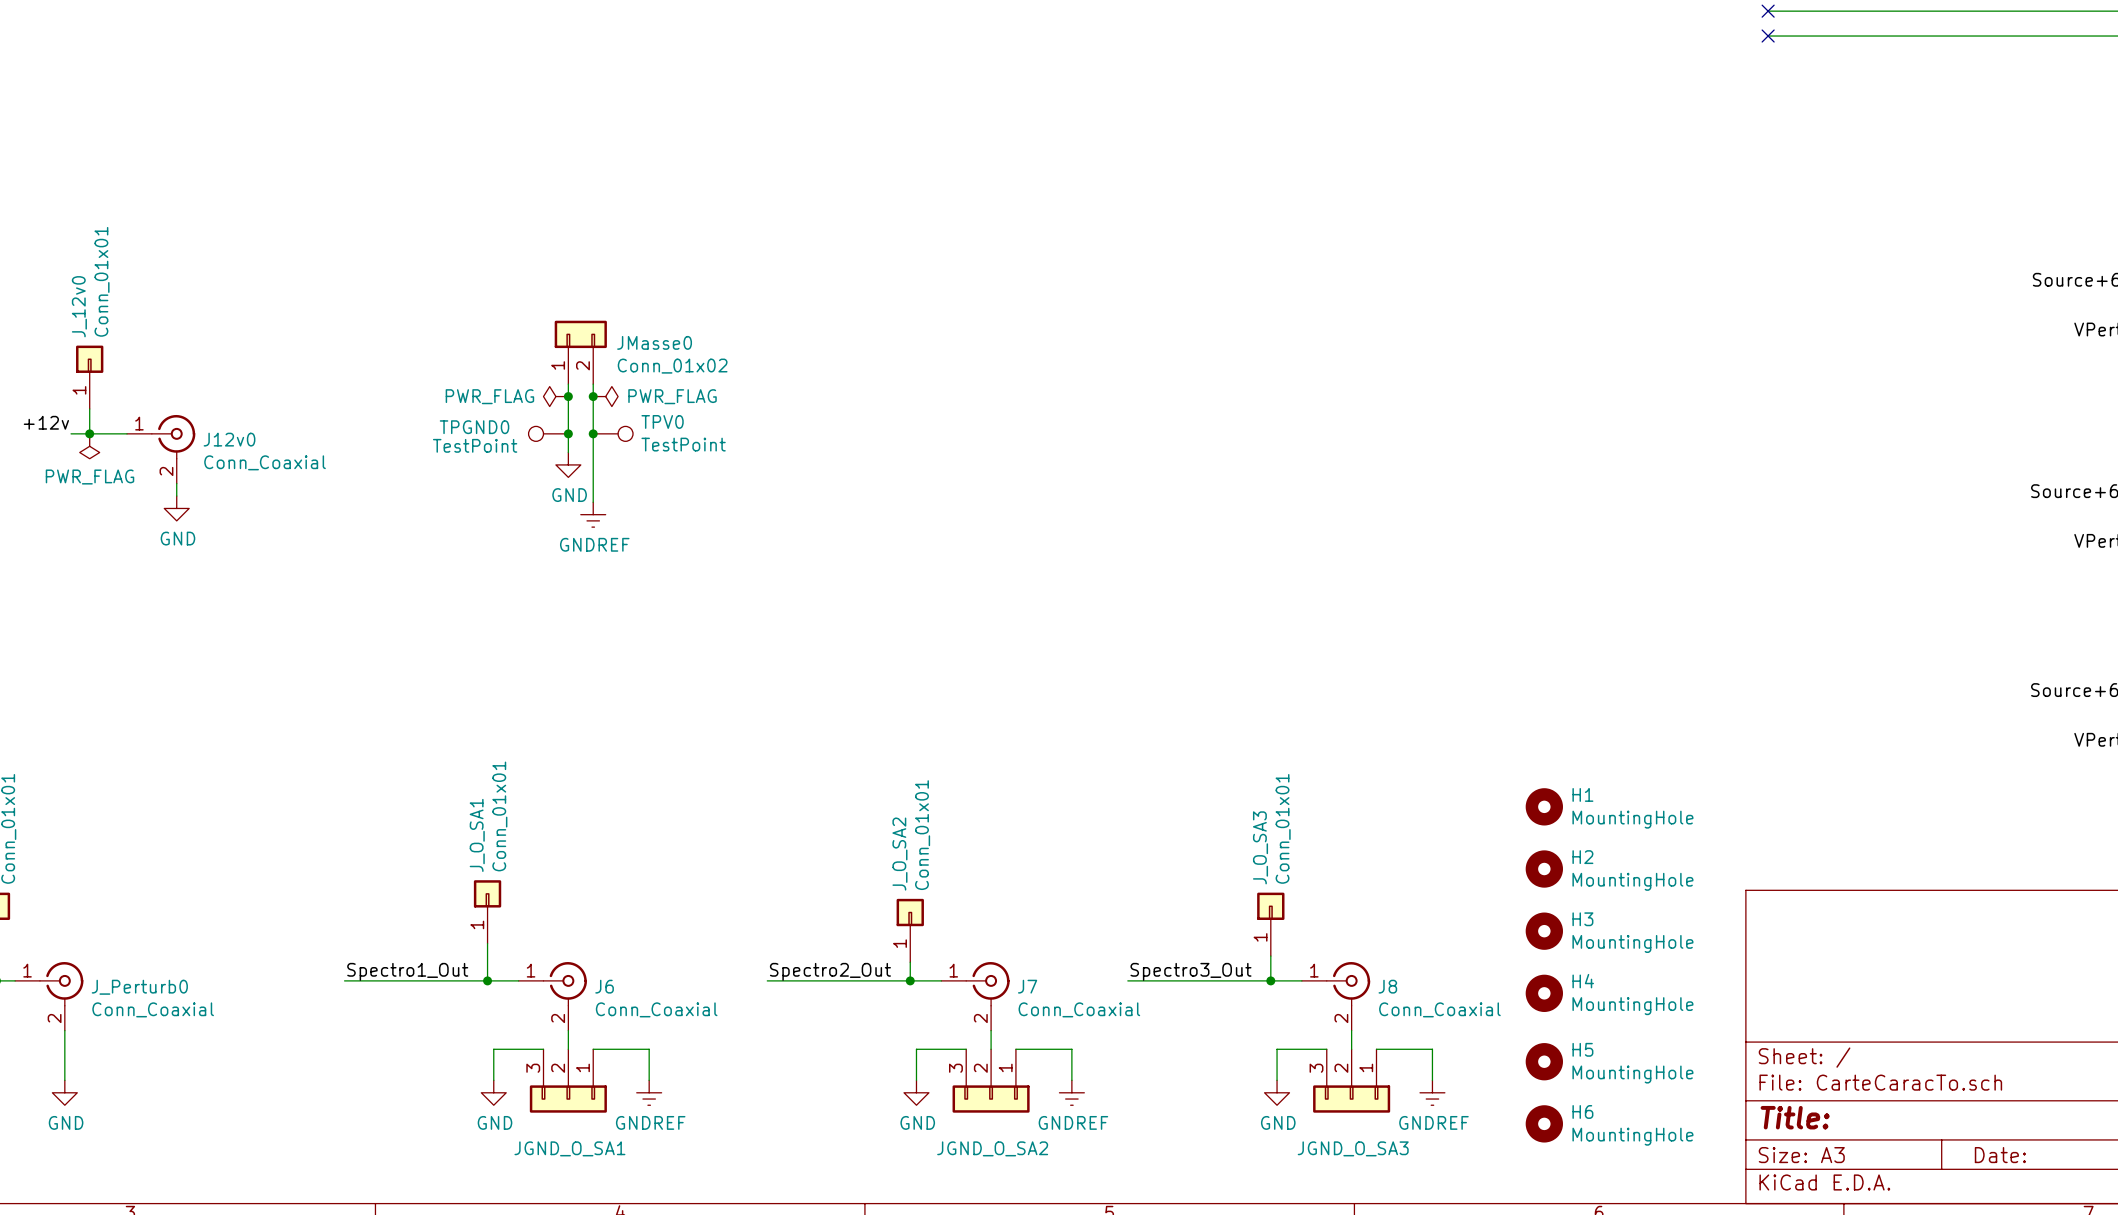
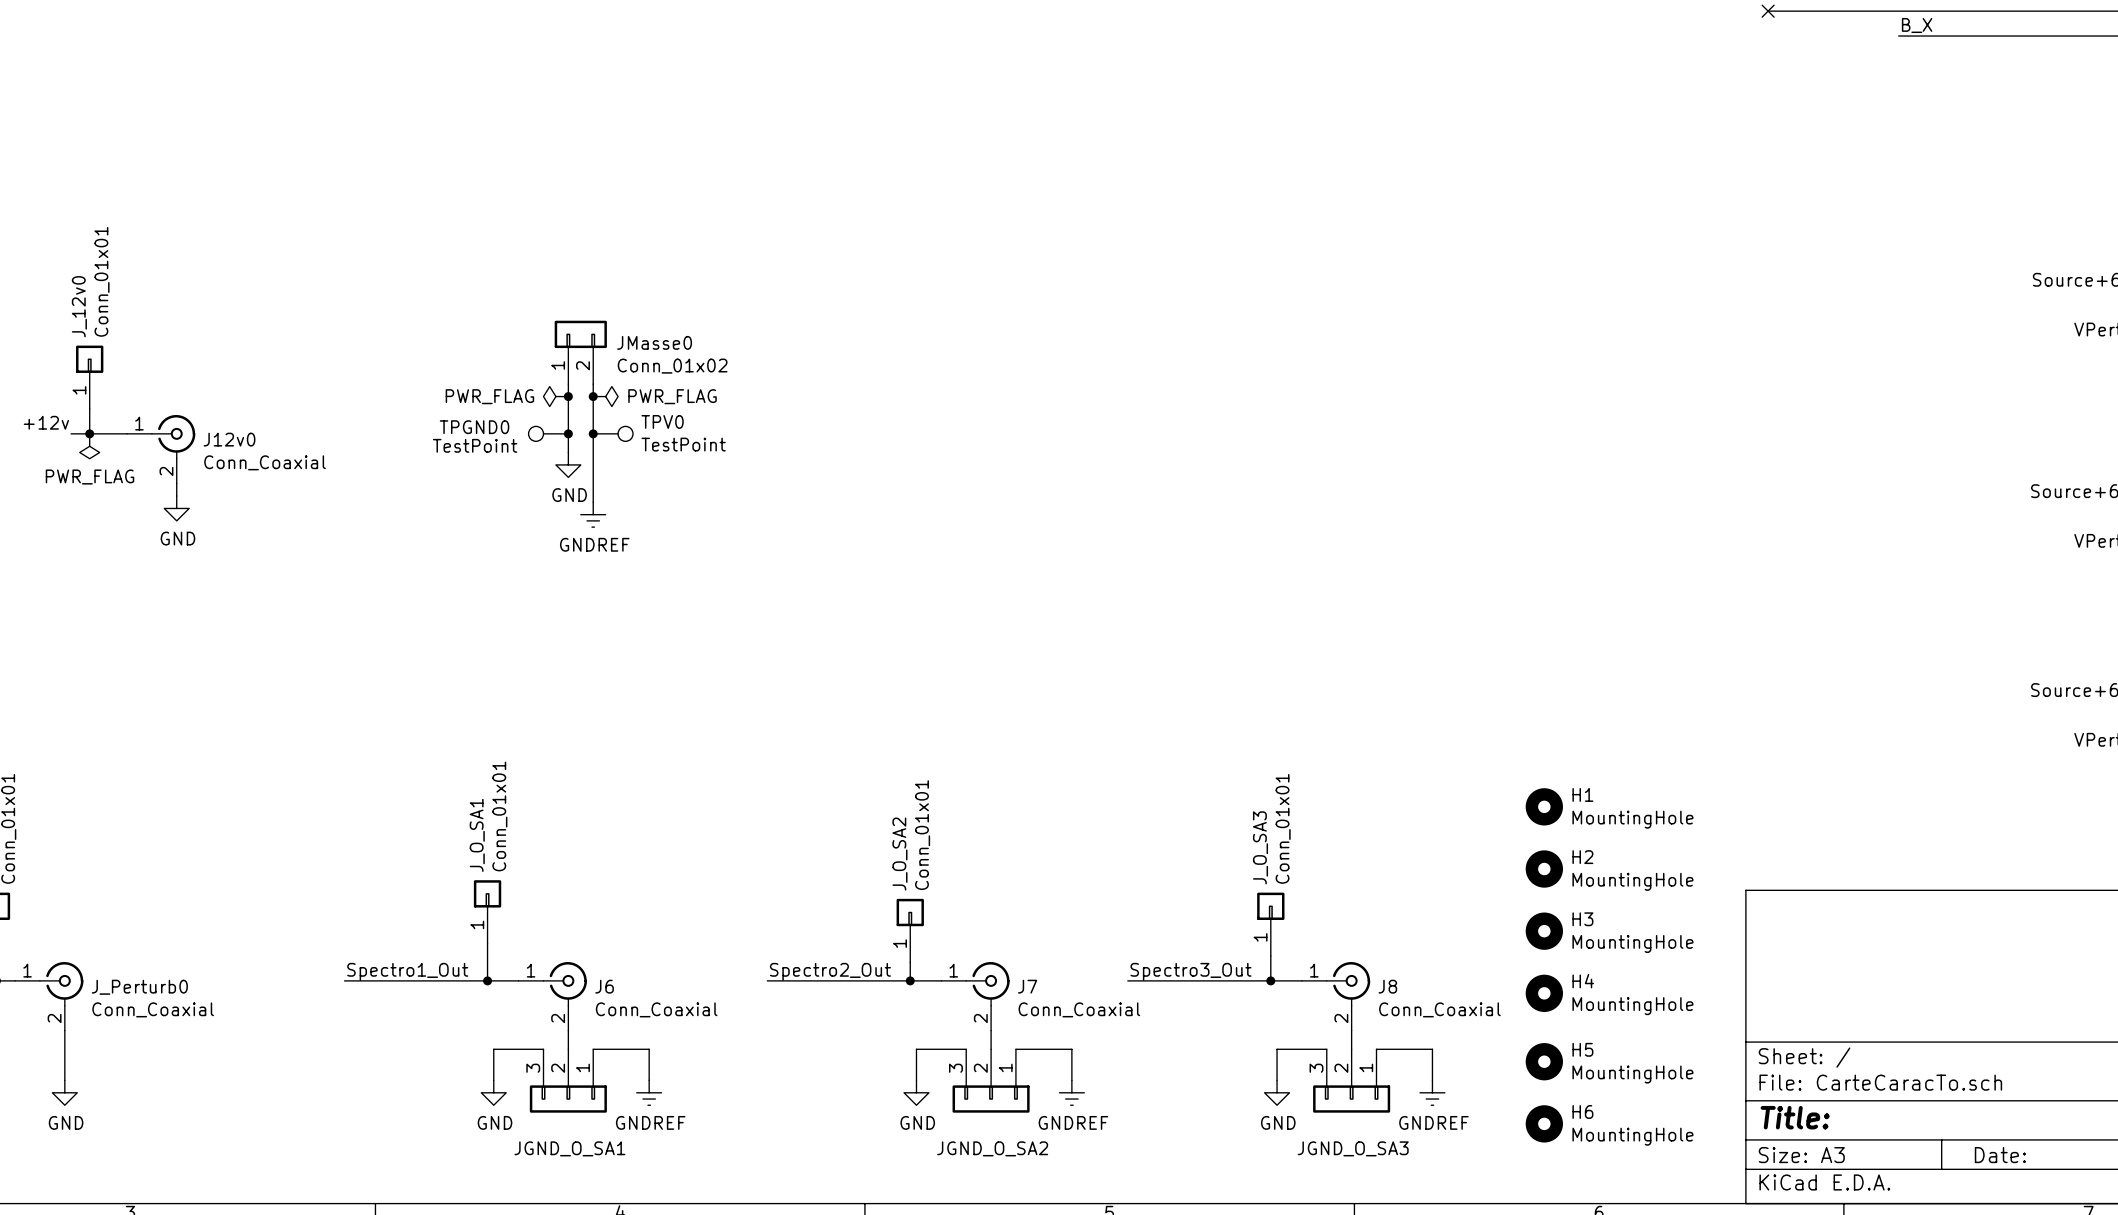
label: none -> B_X (1917, 25)
wire: (1768, 36) (1898, 36) -> none
no-connect mark: (1768, 36) -> none

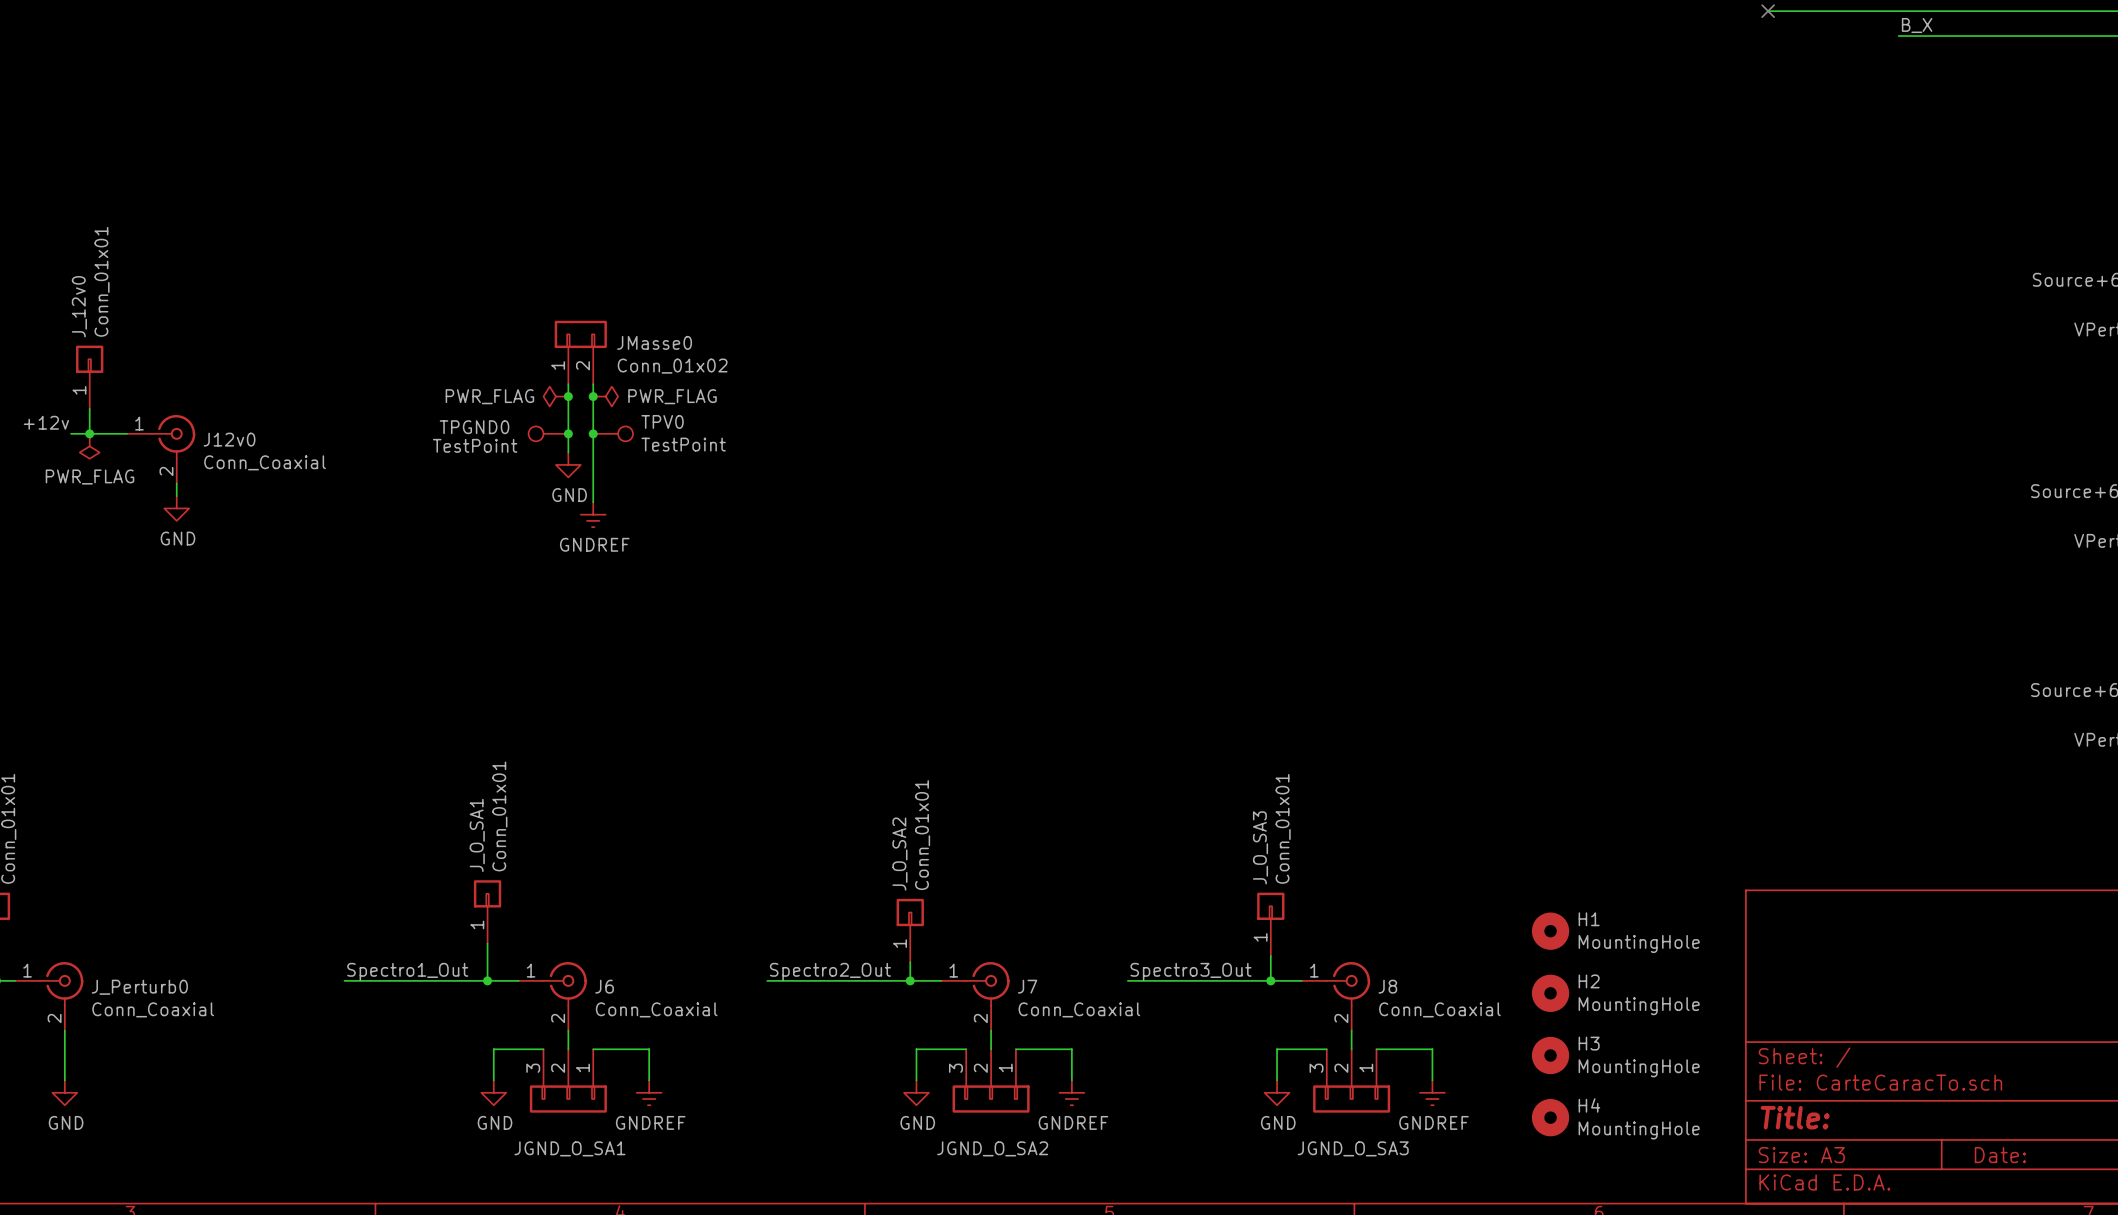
H1 position: (1544, 806) -> (1550, 931)
H2 position: (1544, 869) -> (1550, 993)
H3 position: (1544, 931) -> (1550, 1055)
H4 position: (1544, 993) -> (1550, 1117)
H5: MountingHole (1544, 1061) -> none
H6: MountingHole (1544, 1123) -> none

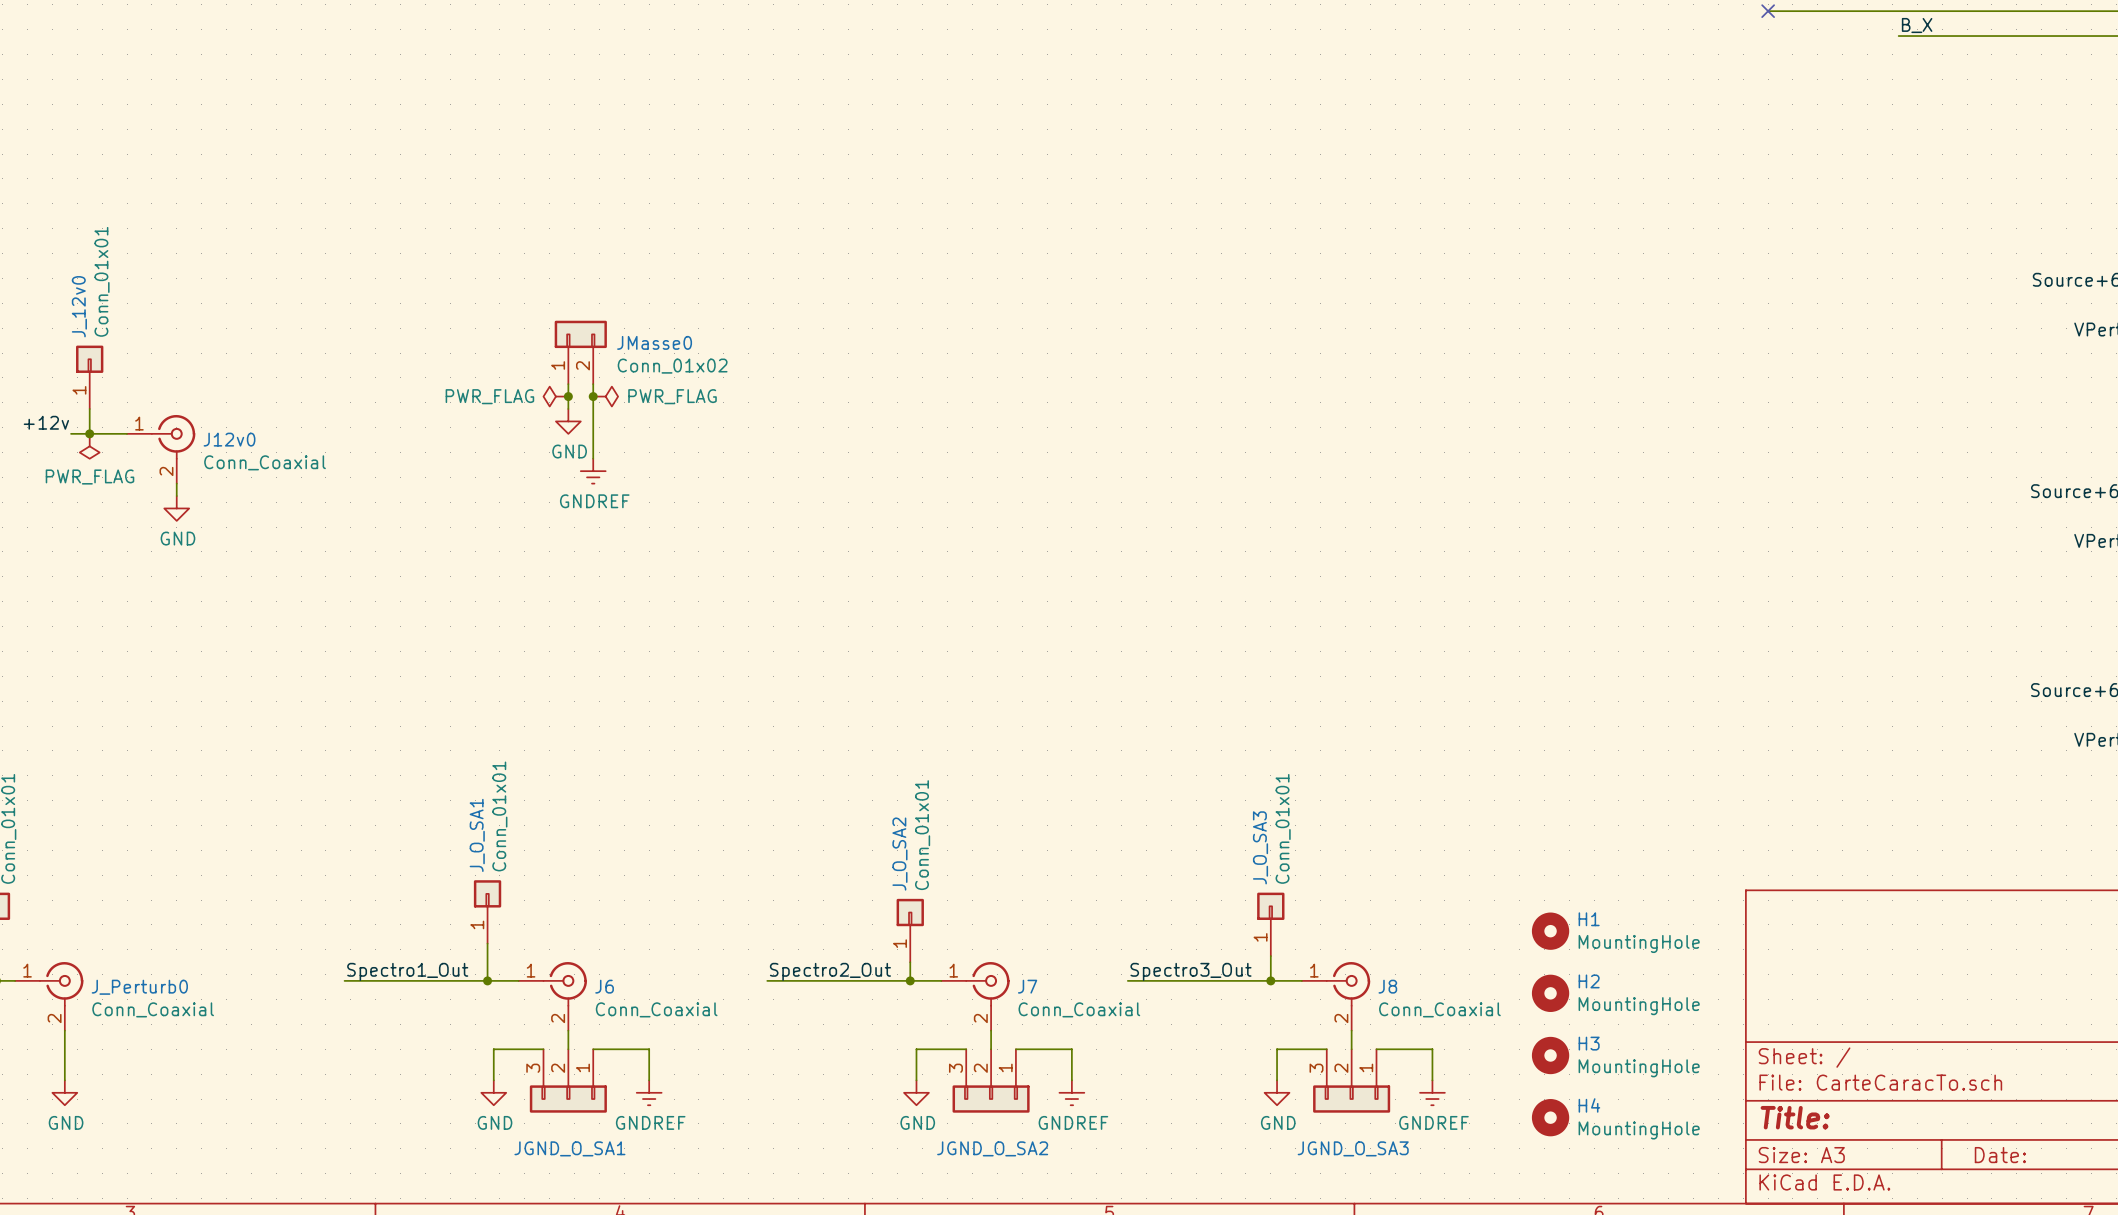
wire: (568, 409) (568, 452) -> none
TPGND0: TestPoint (548, 433) -> none
junction: (568, 433) -> none
junction: (593, 433) -> none
TPV0: TestPoint (613, 433) -> none
wire: (593, 458) (593, 502) -> none
power symbol position: GND (568, 464) -> GND (568, 421)
power symbol position: GNDREF (593, 514) -> GNDREF (593, 471)

